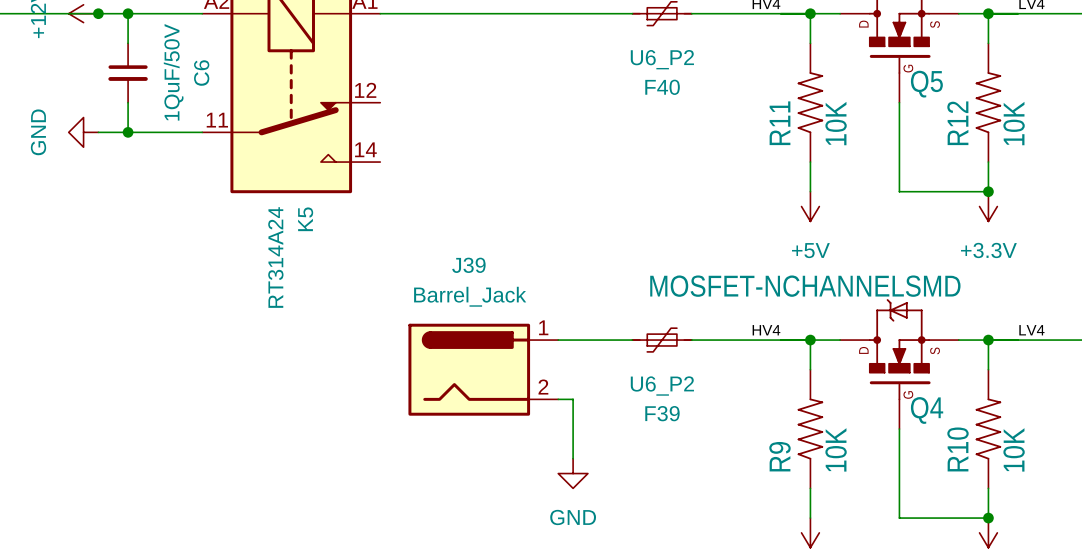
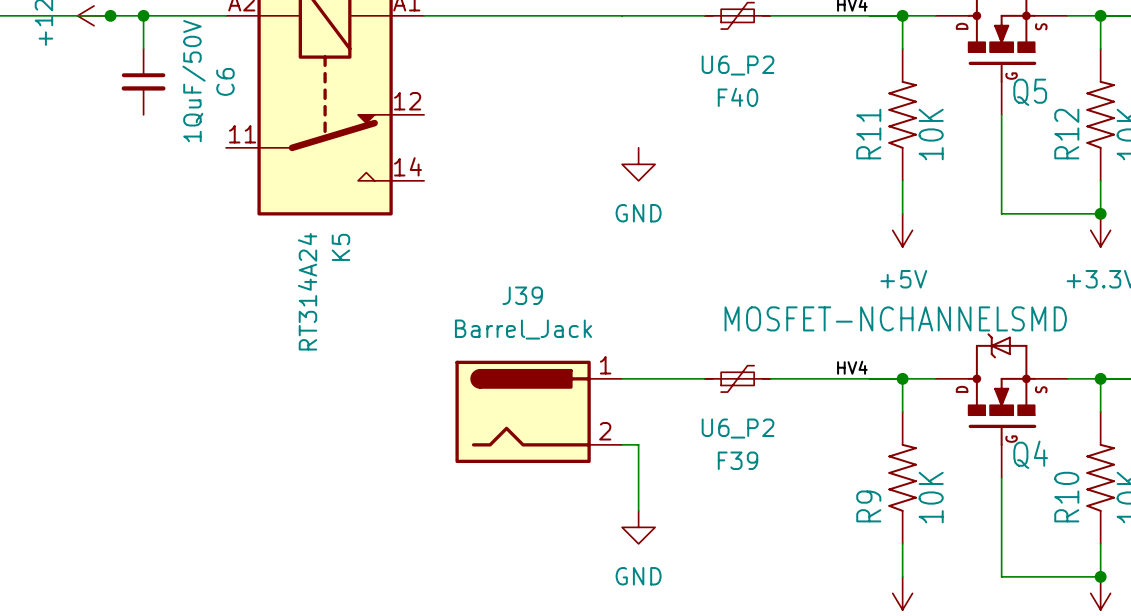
wire: (128, 102) (128, 132) -> none
power symbol: GND (83, 132) -> none
wire: (98, 132) (202, 132) -> none
junction: (128, 132) -> none
power symbol: none -> GND (638, 164)

